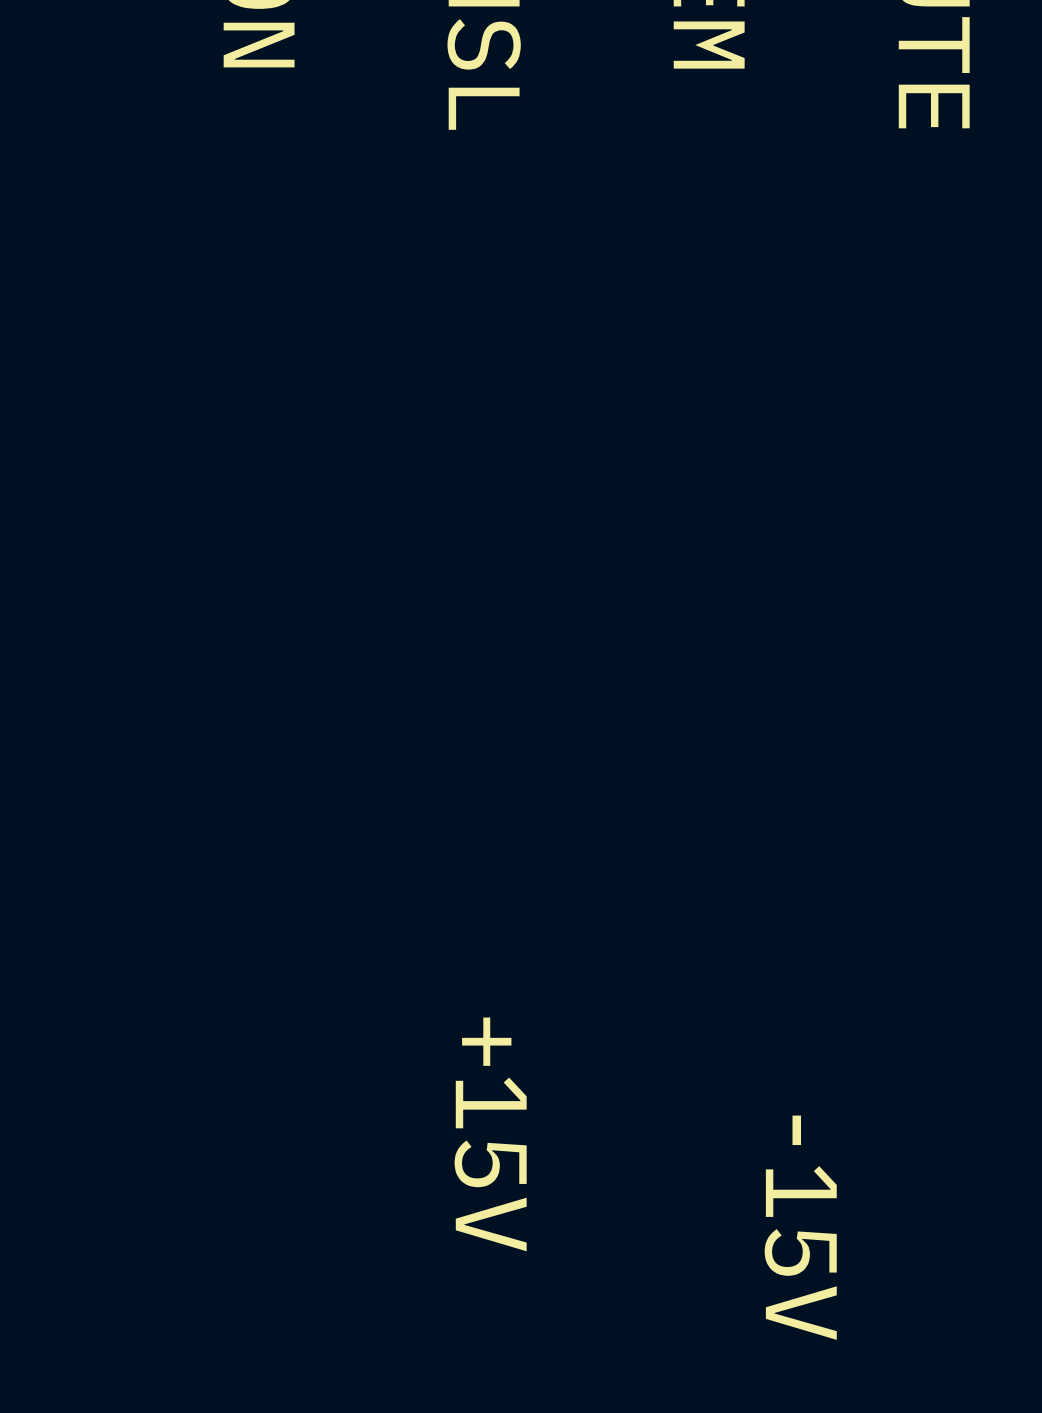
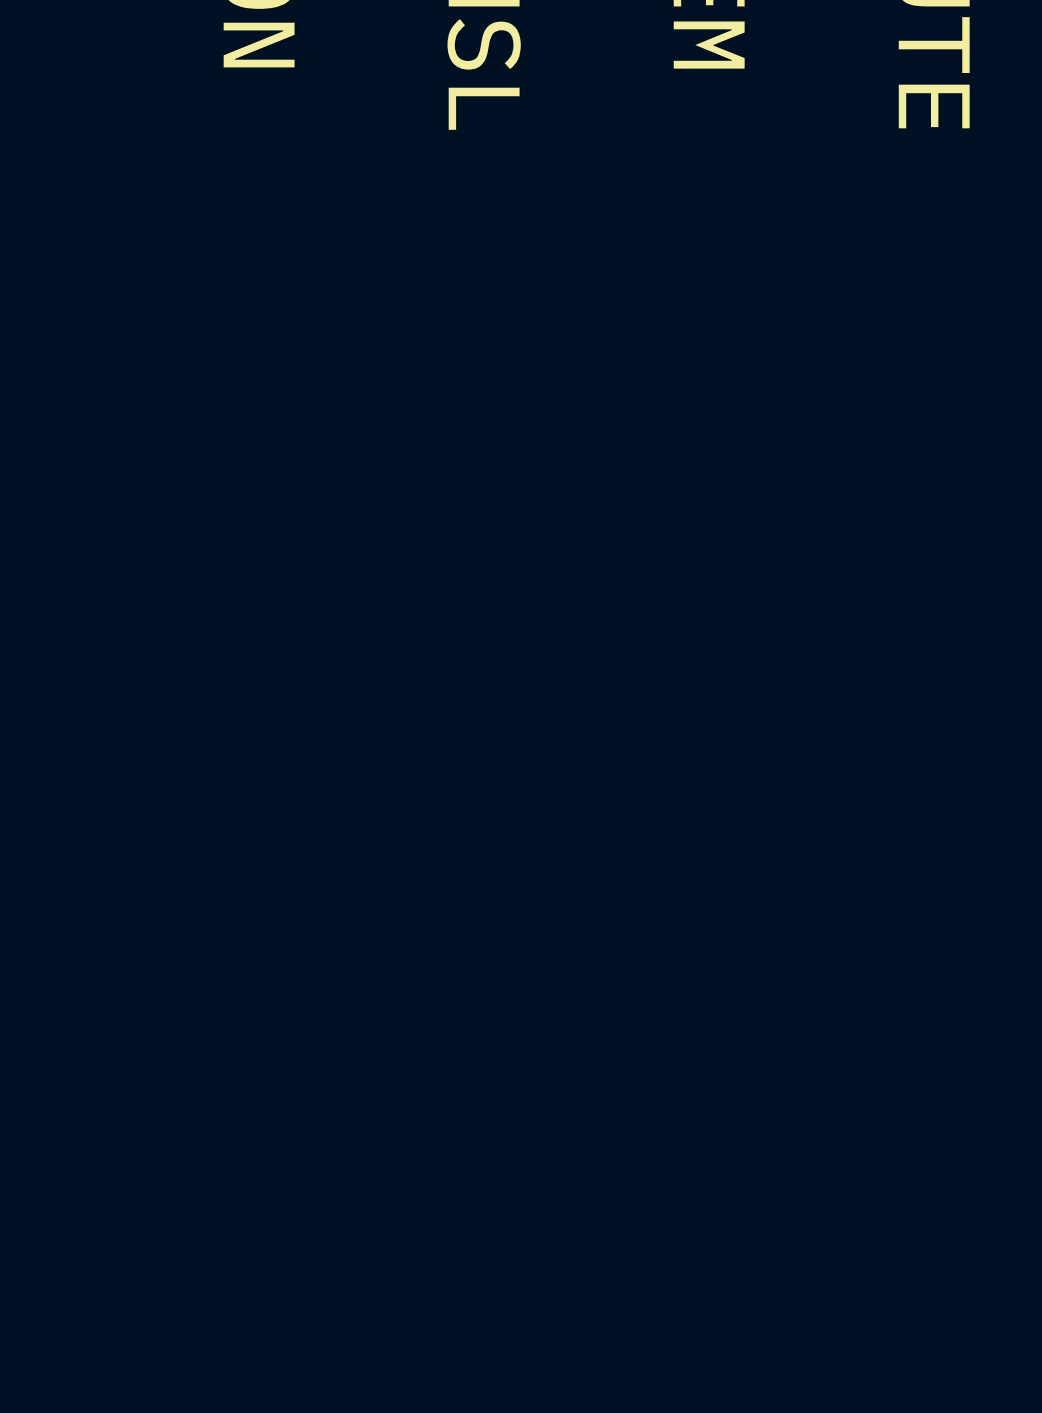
text: +15V (490, 1134) -> none
text: -15V (800, 1227) -> none

